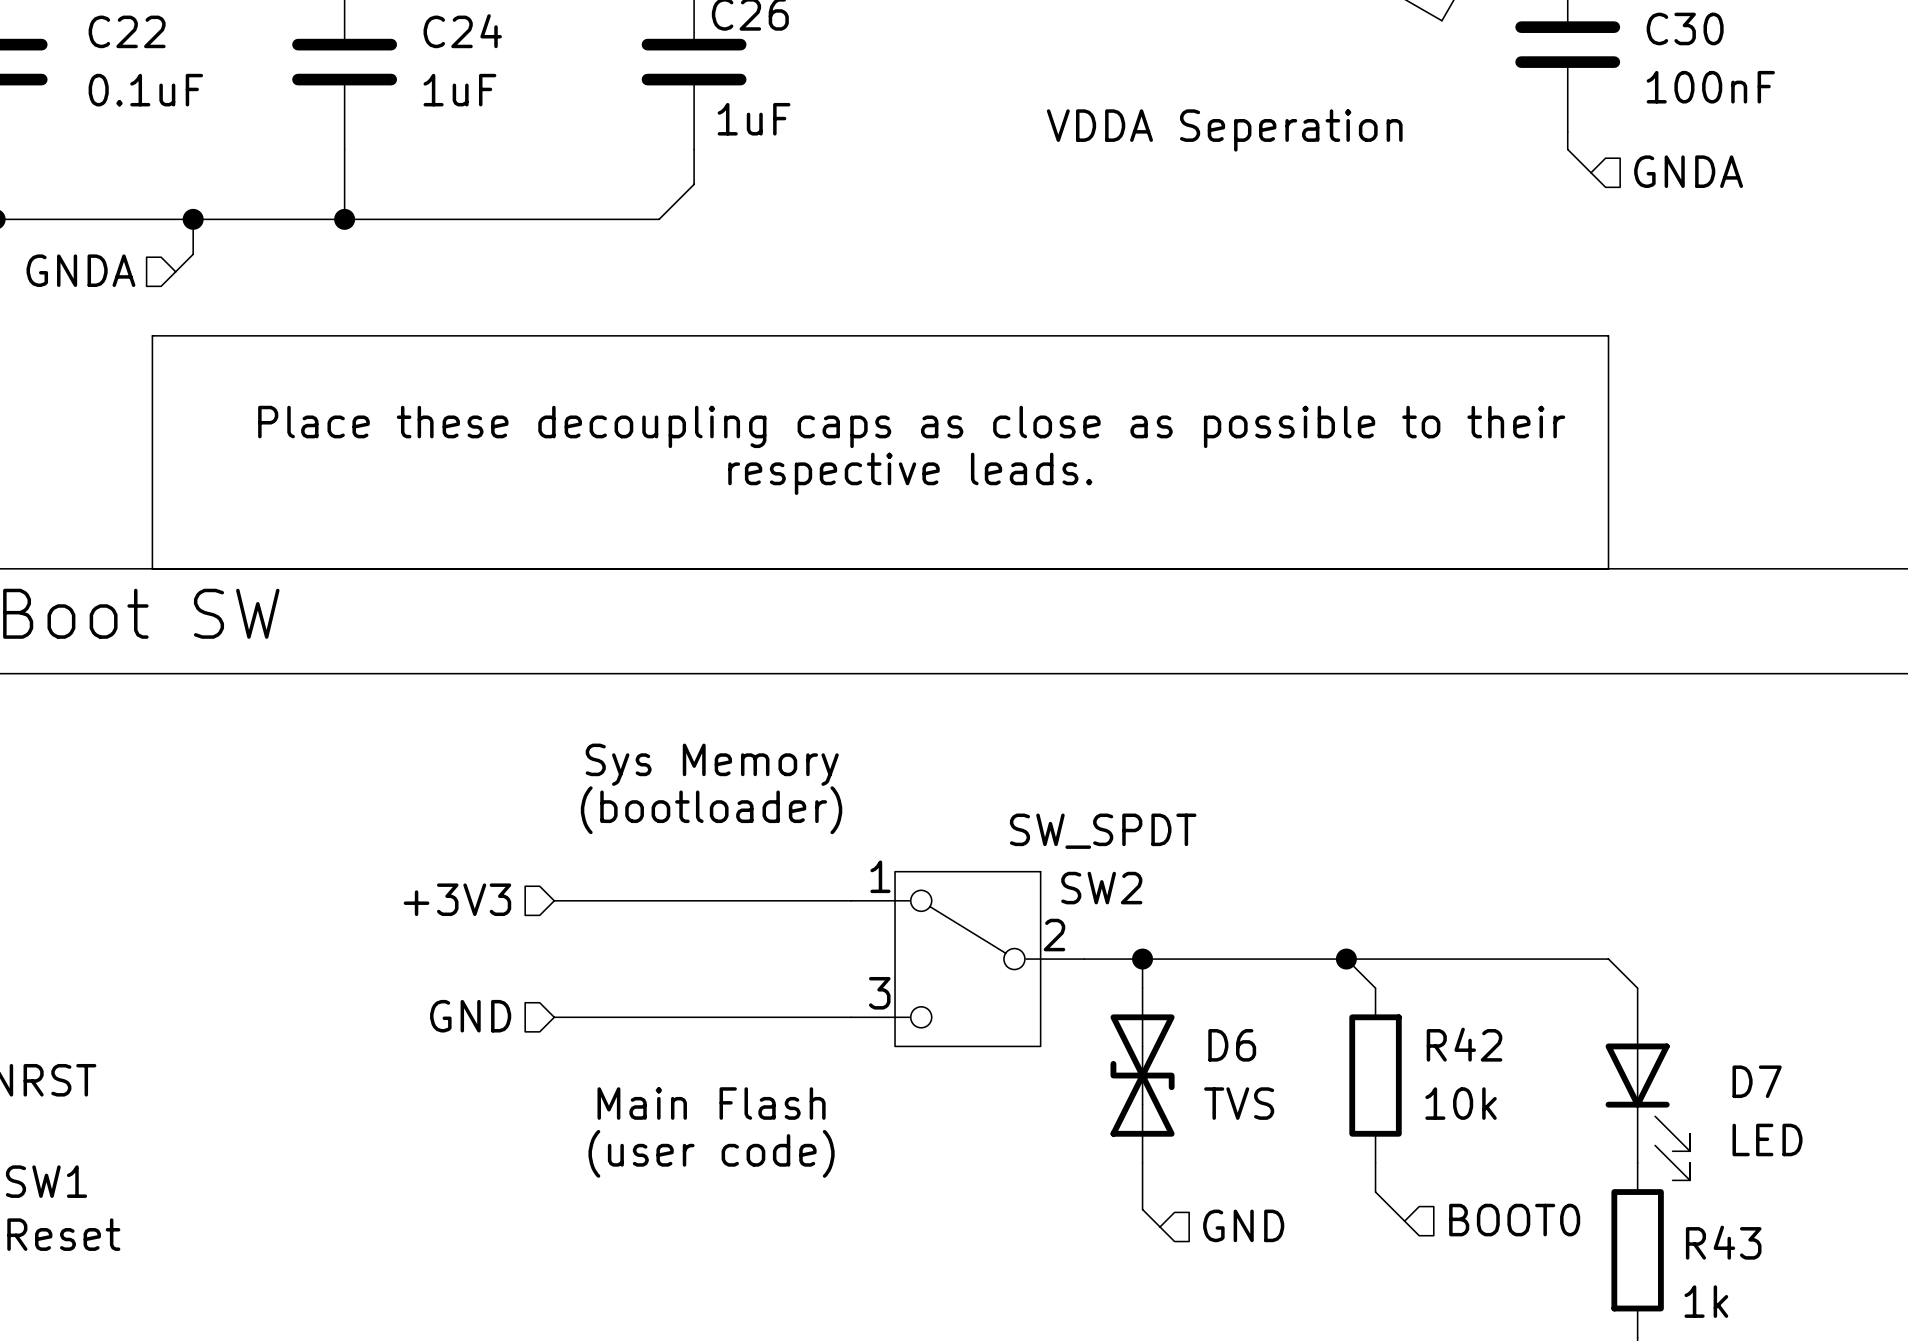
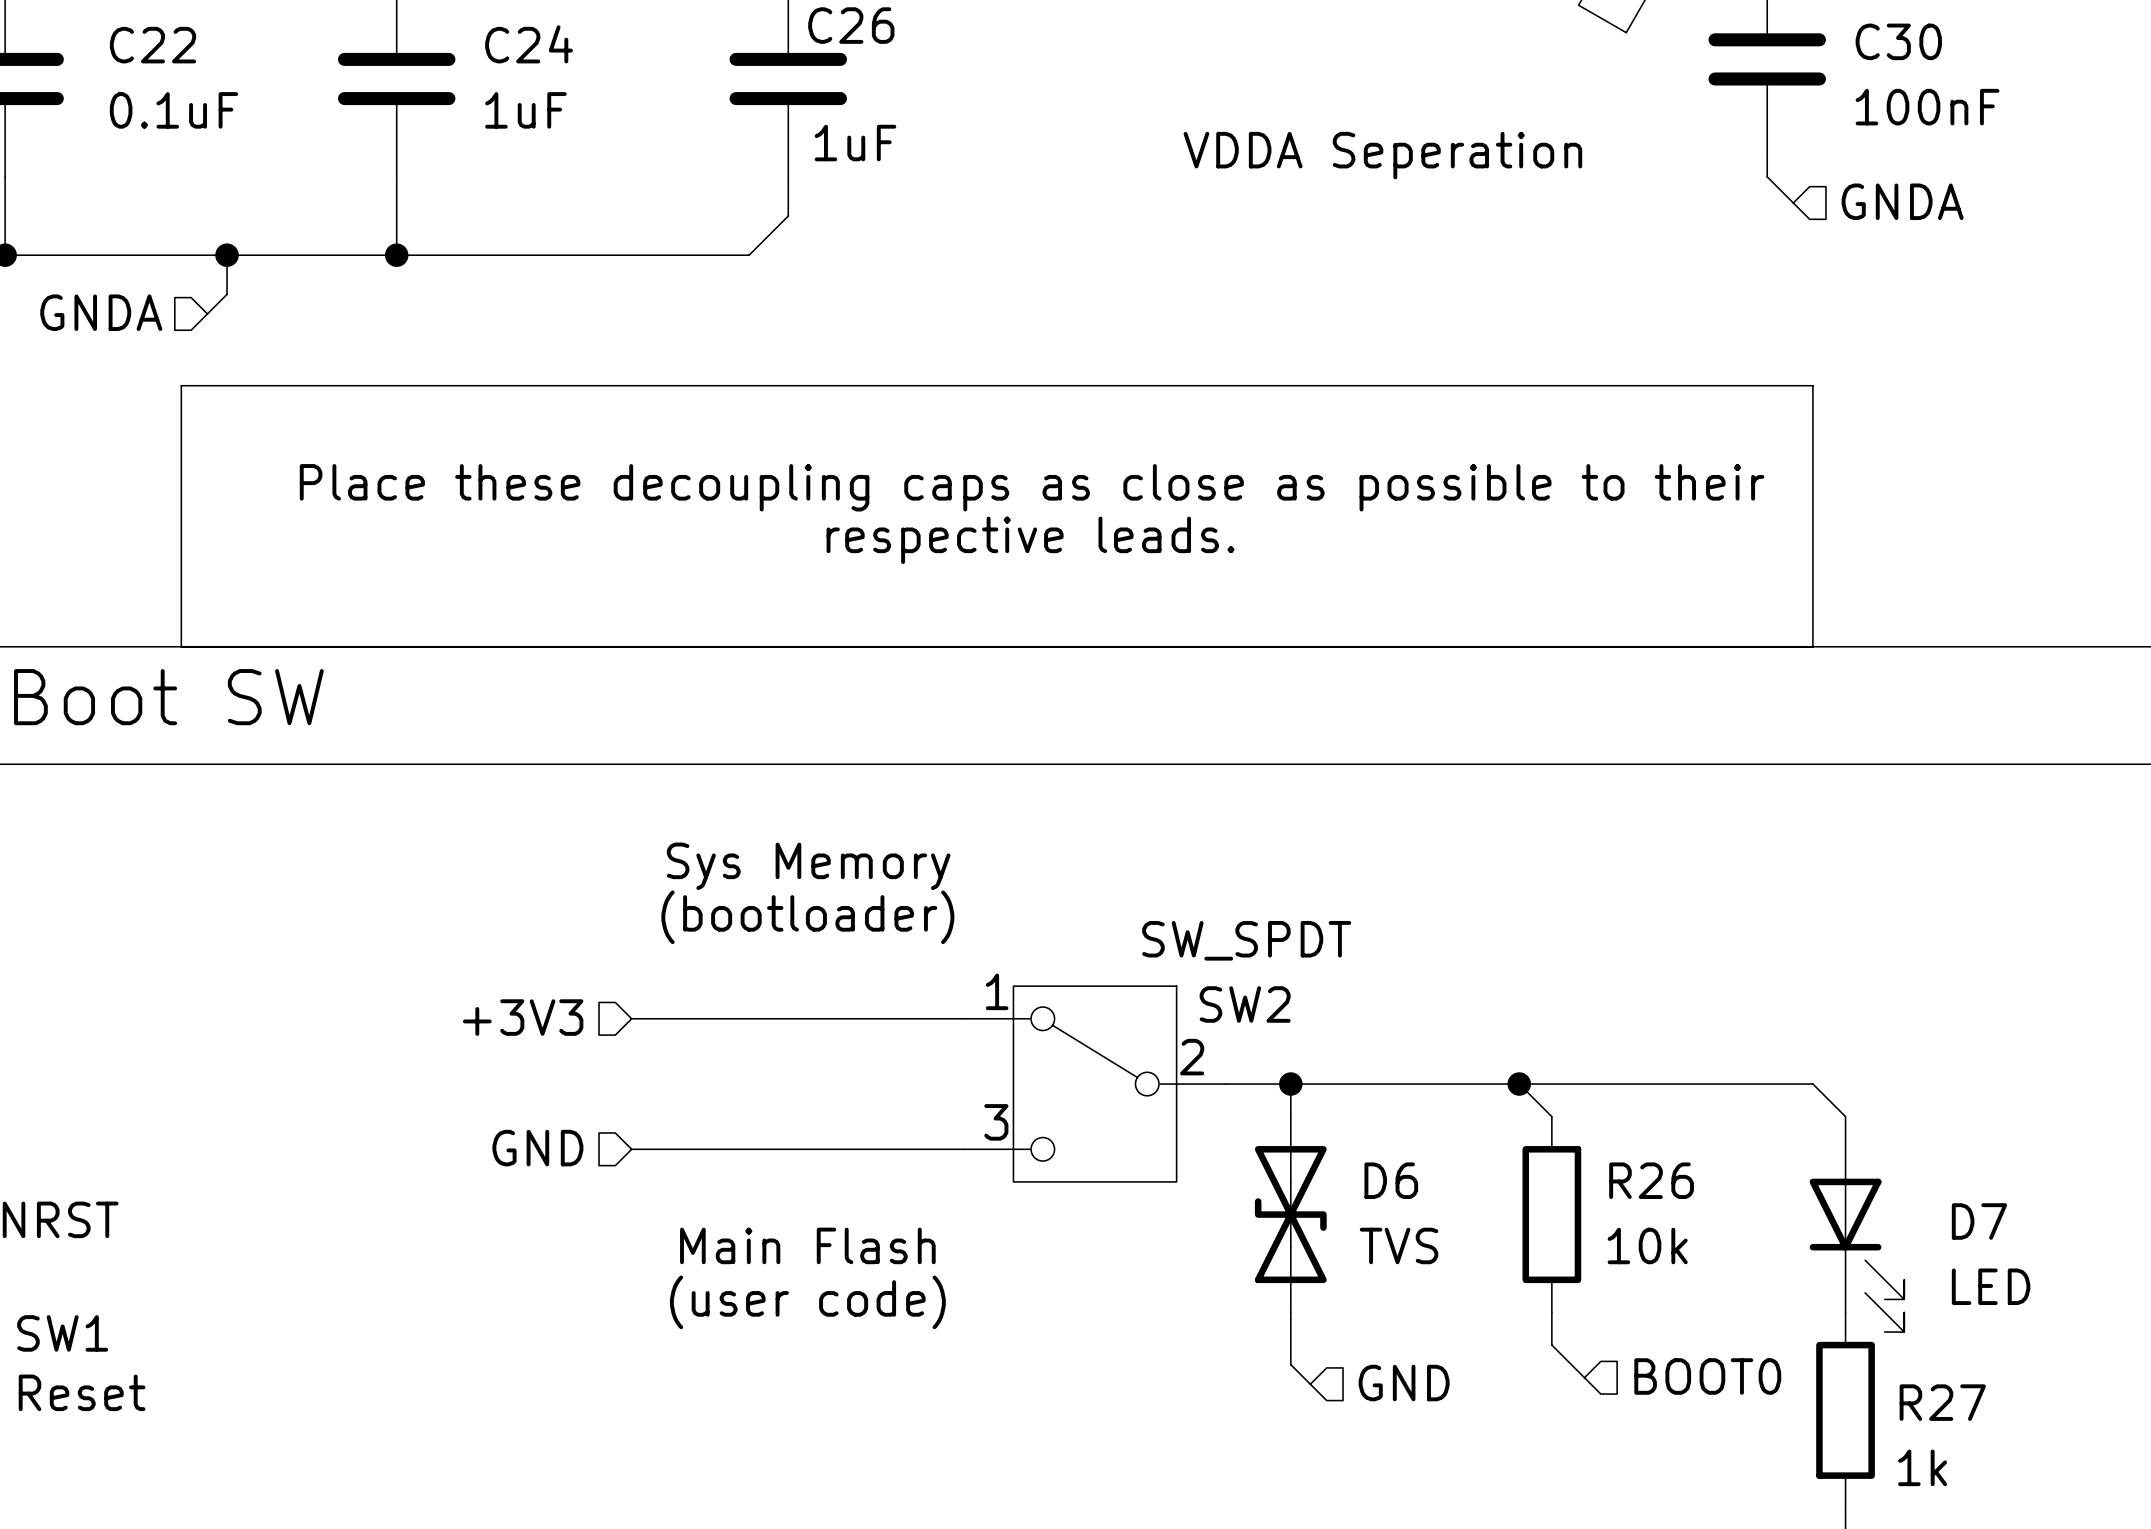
R42 name: R42 (1464, 1044) -> R26 (1651, 1180)
R43 name: R43 (1723, 1242) -> R27 (1942, 1402)

